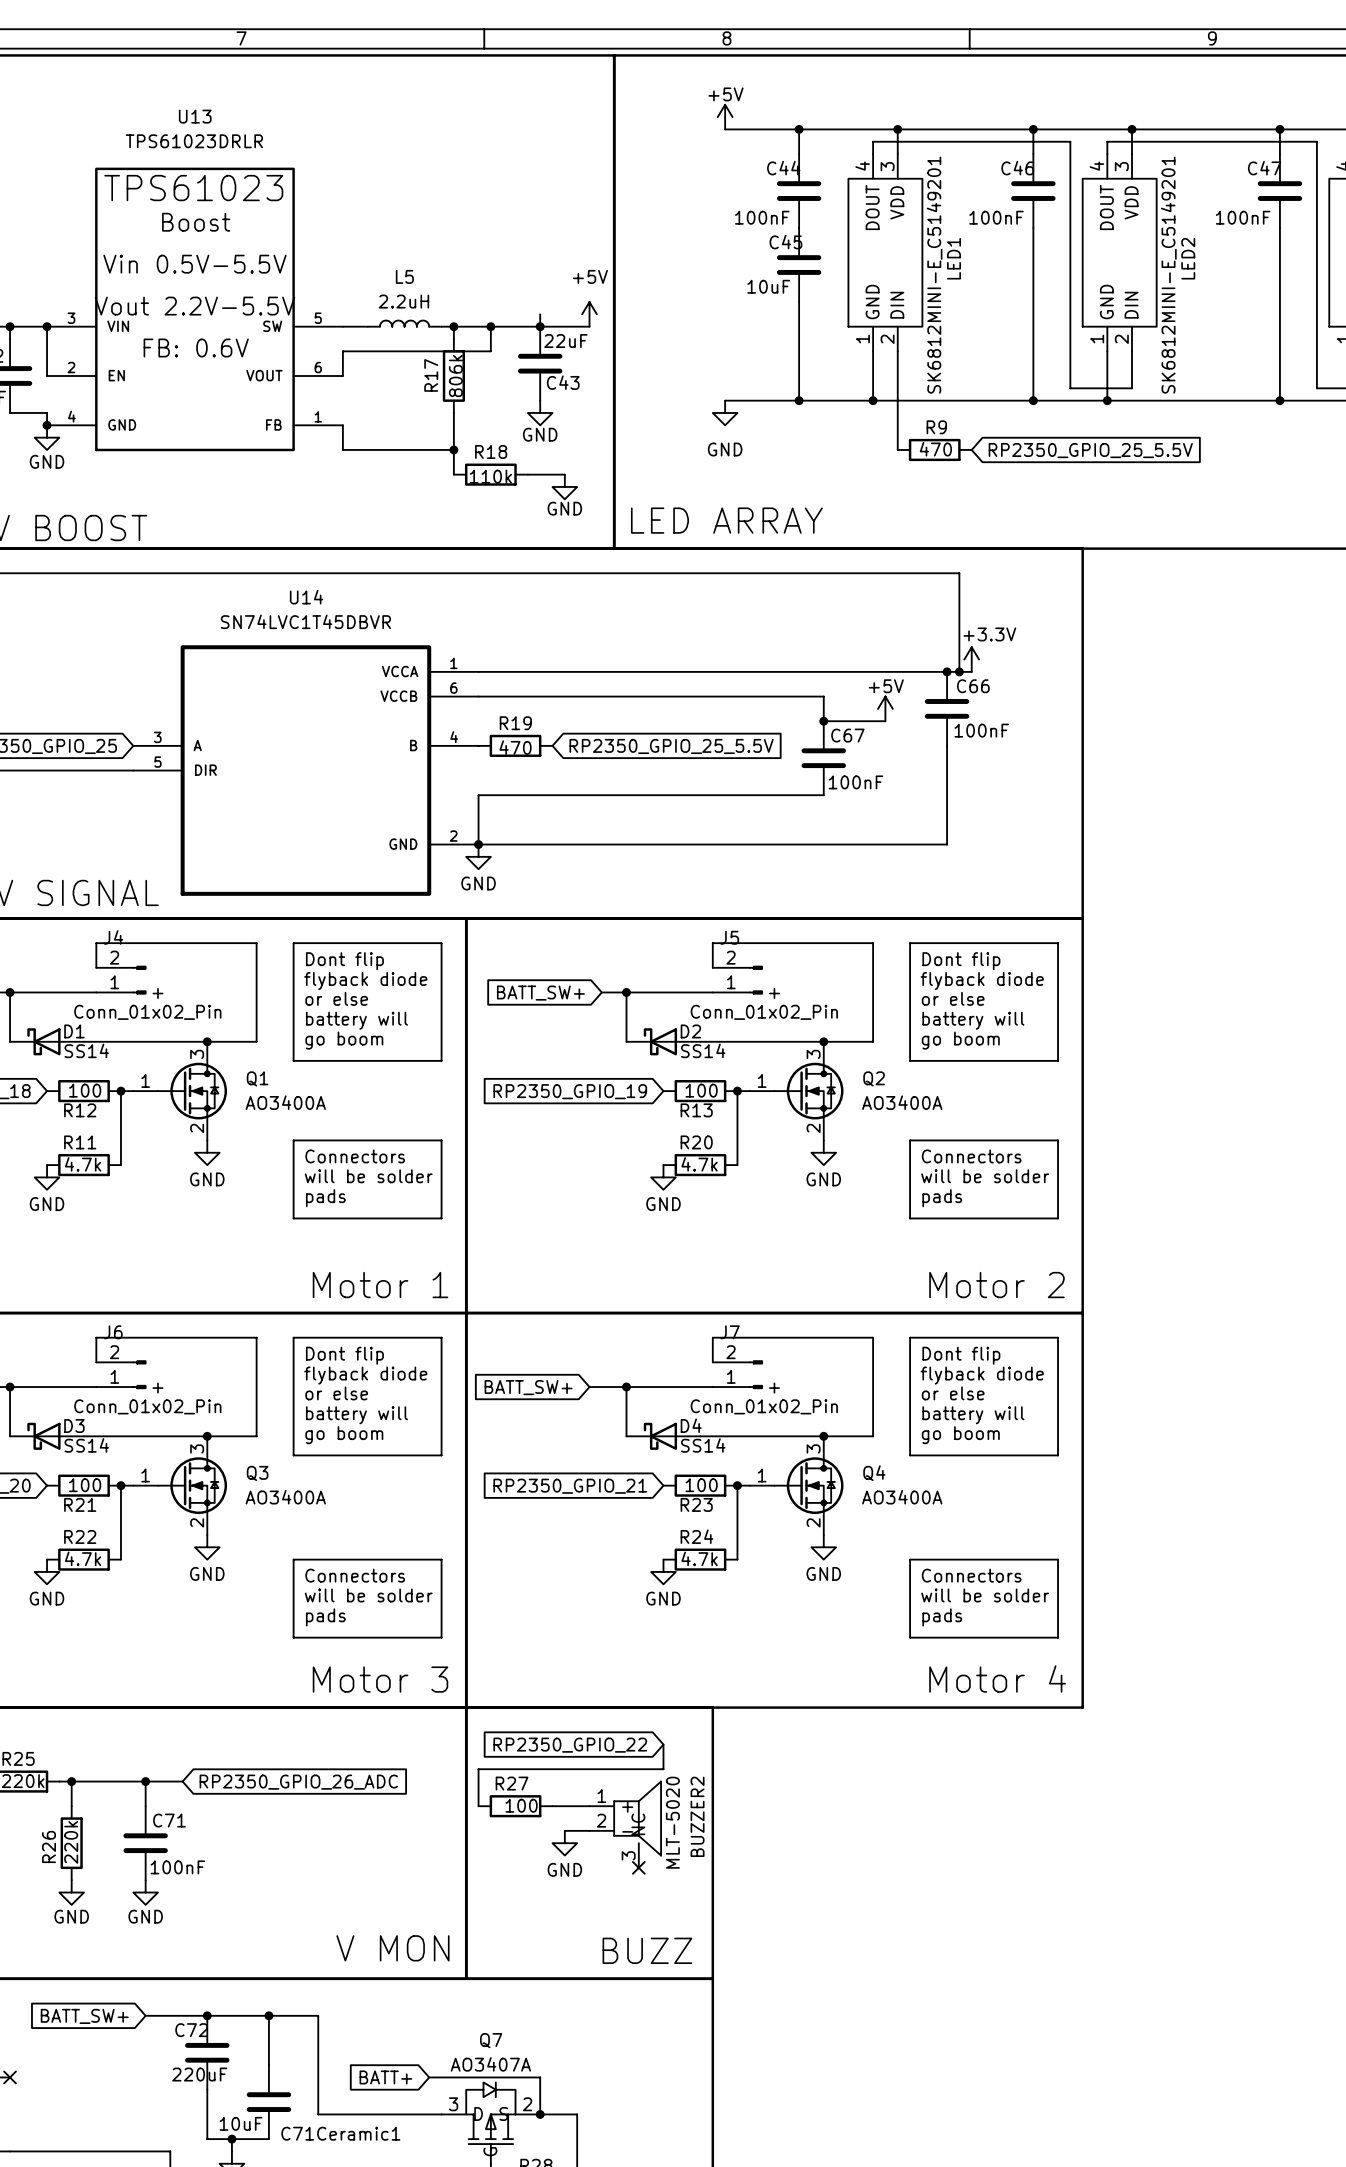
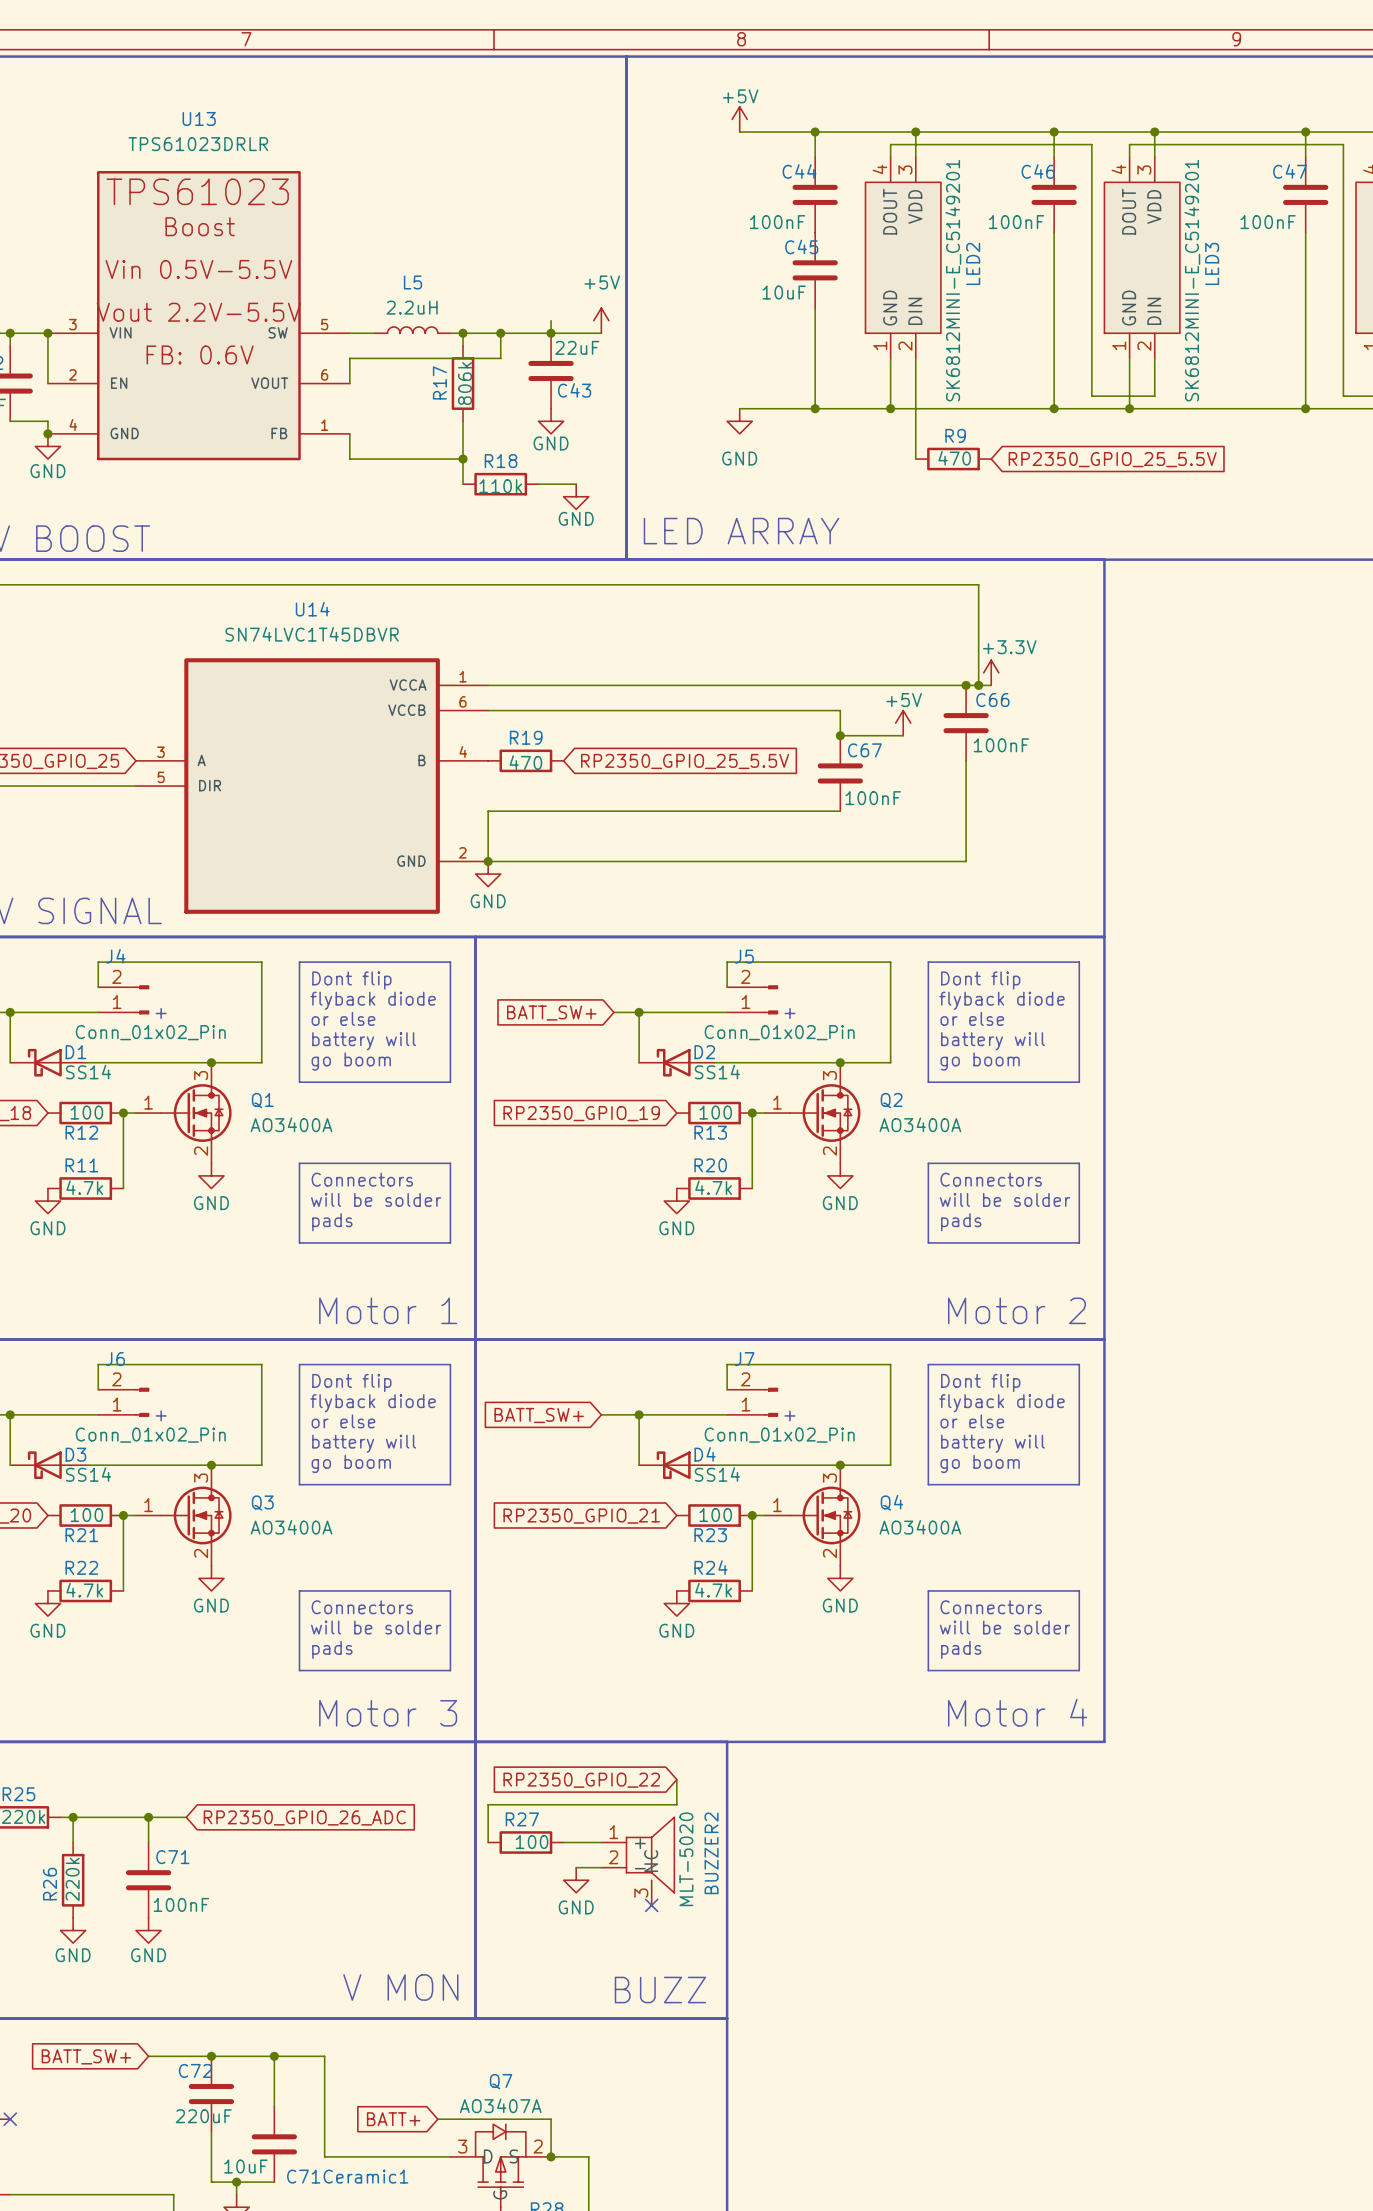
LED1 name: LED1 (954, 258) -> LED2 (973, 263)
LED2 name: LED2 (1188, 258) -> LED3 (1212, 263)

